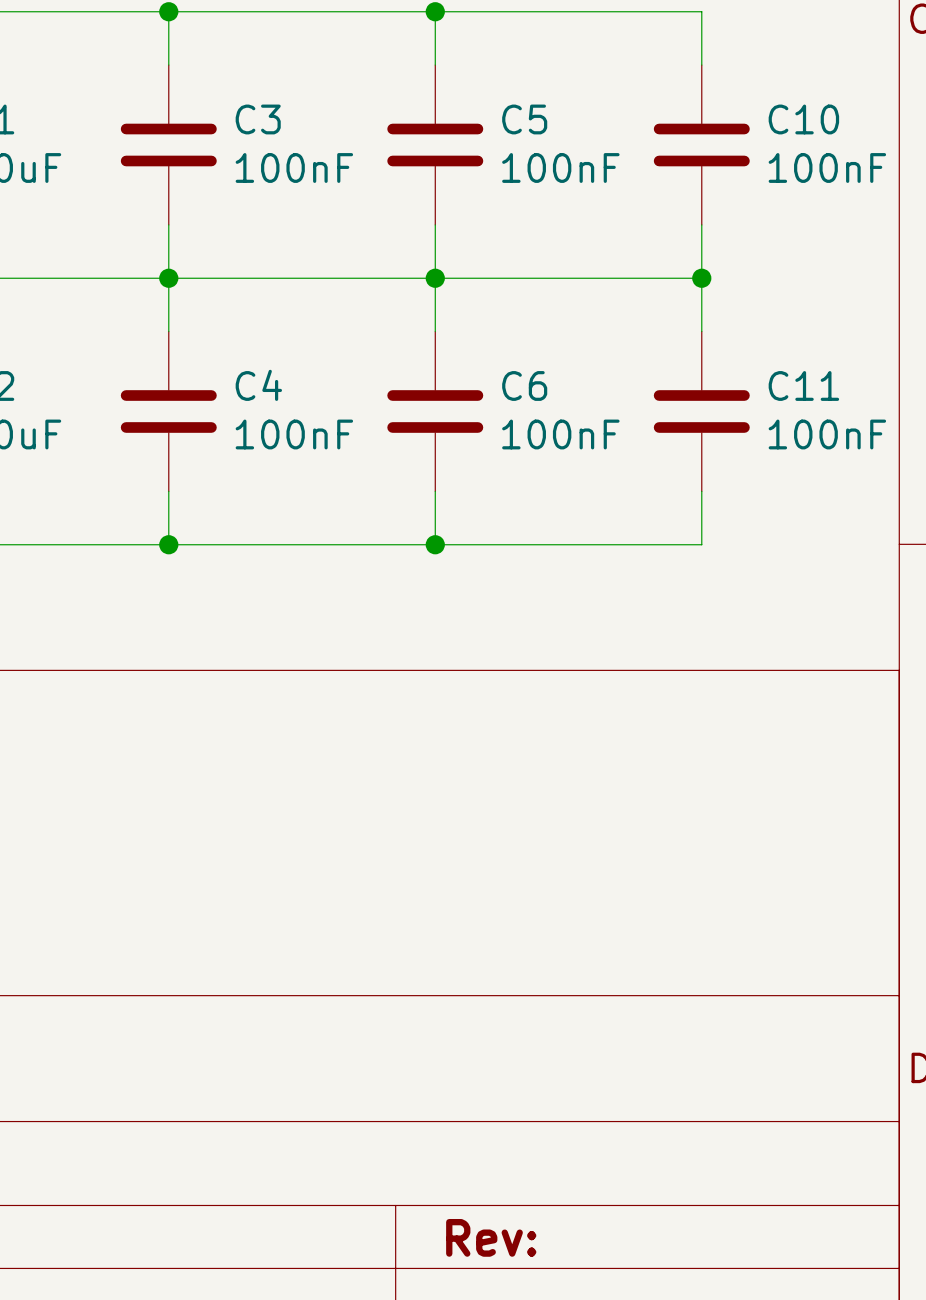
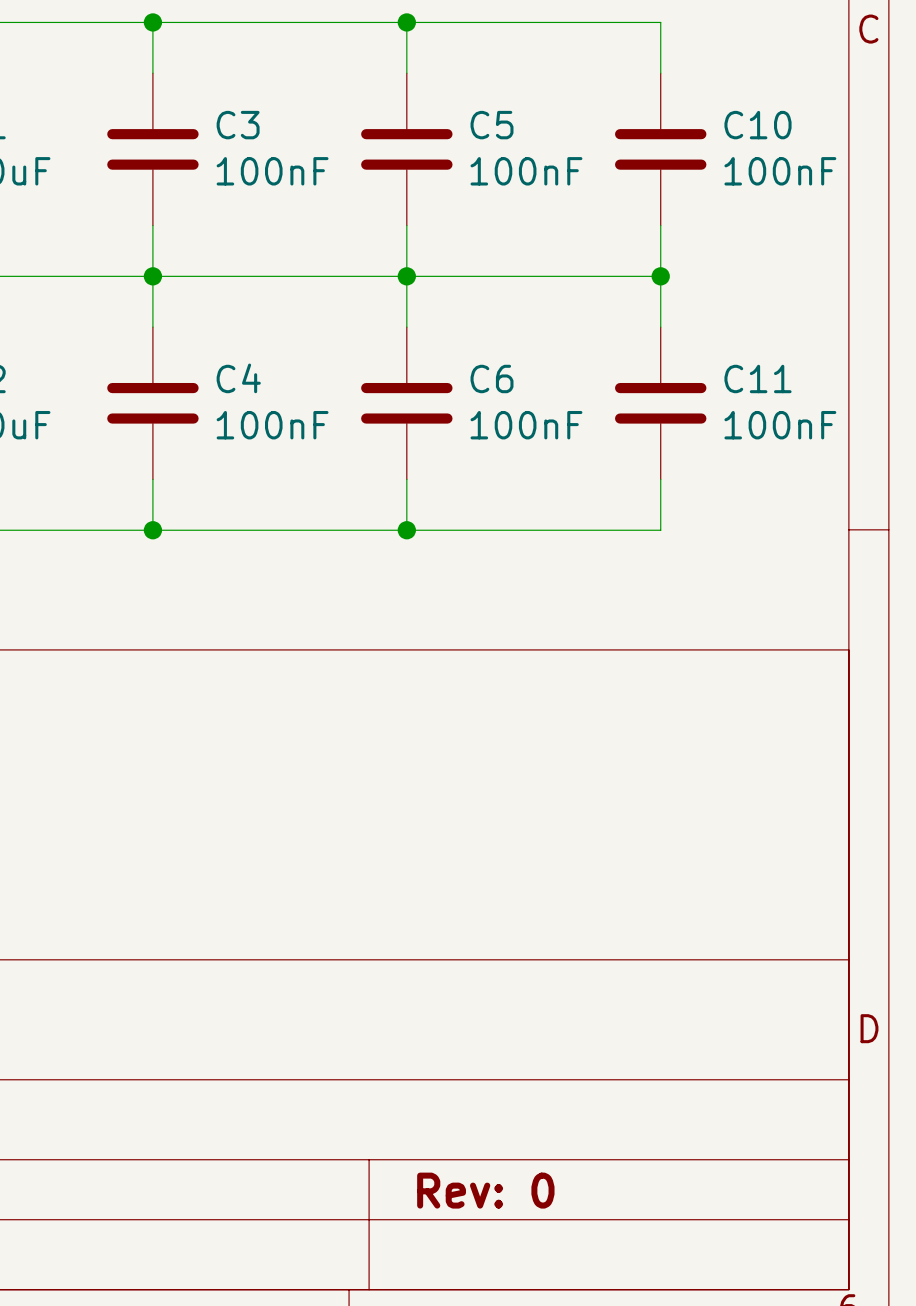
title block: Rev: (491, 1237) -> Rev: 0 (485, 1190)

